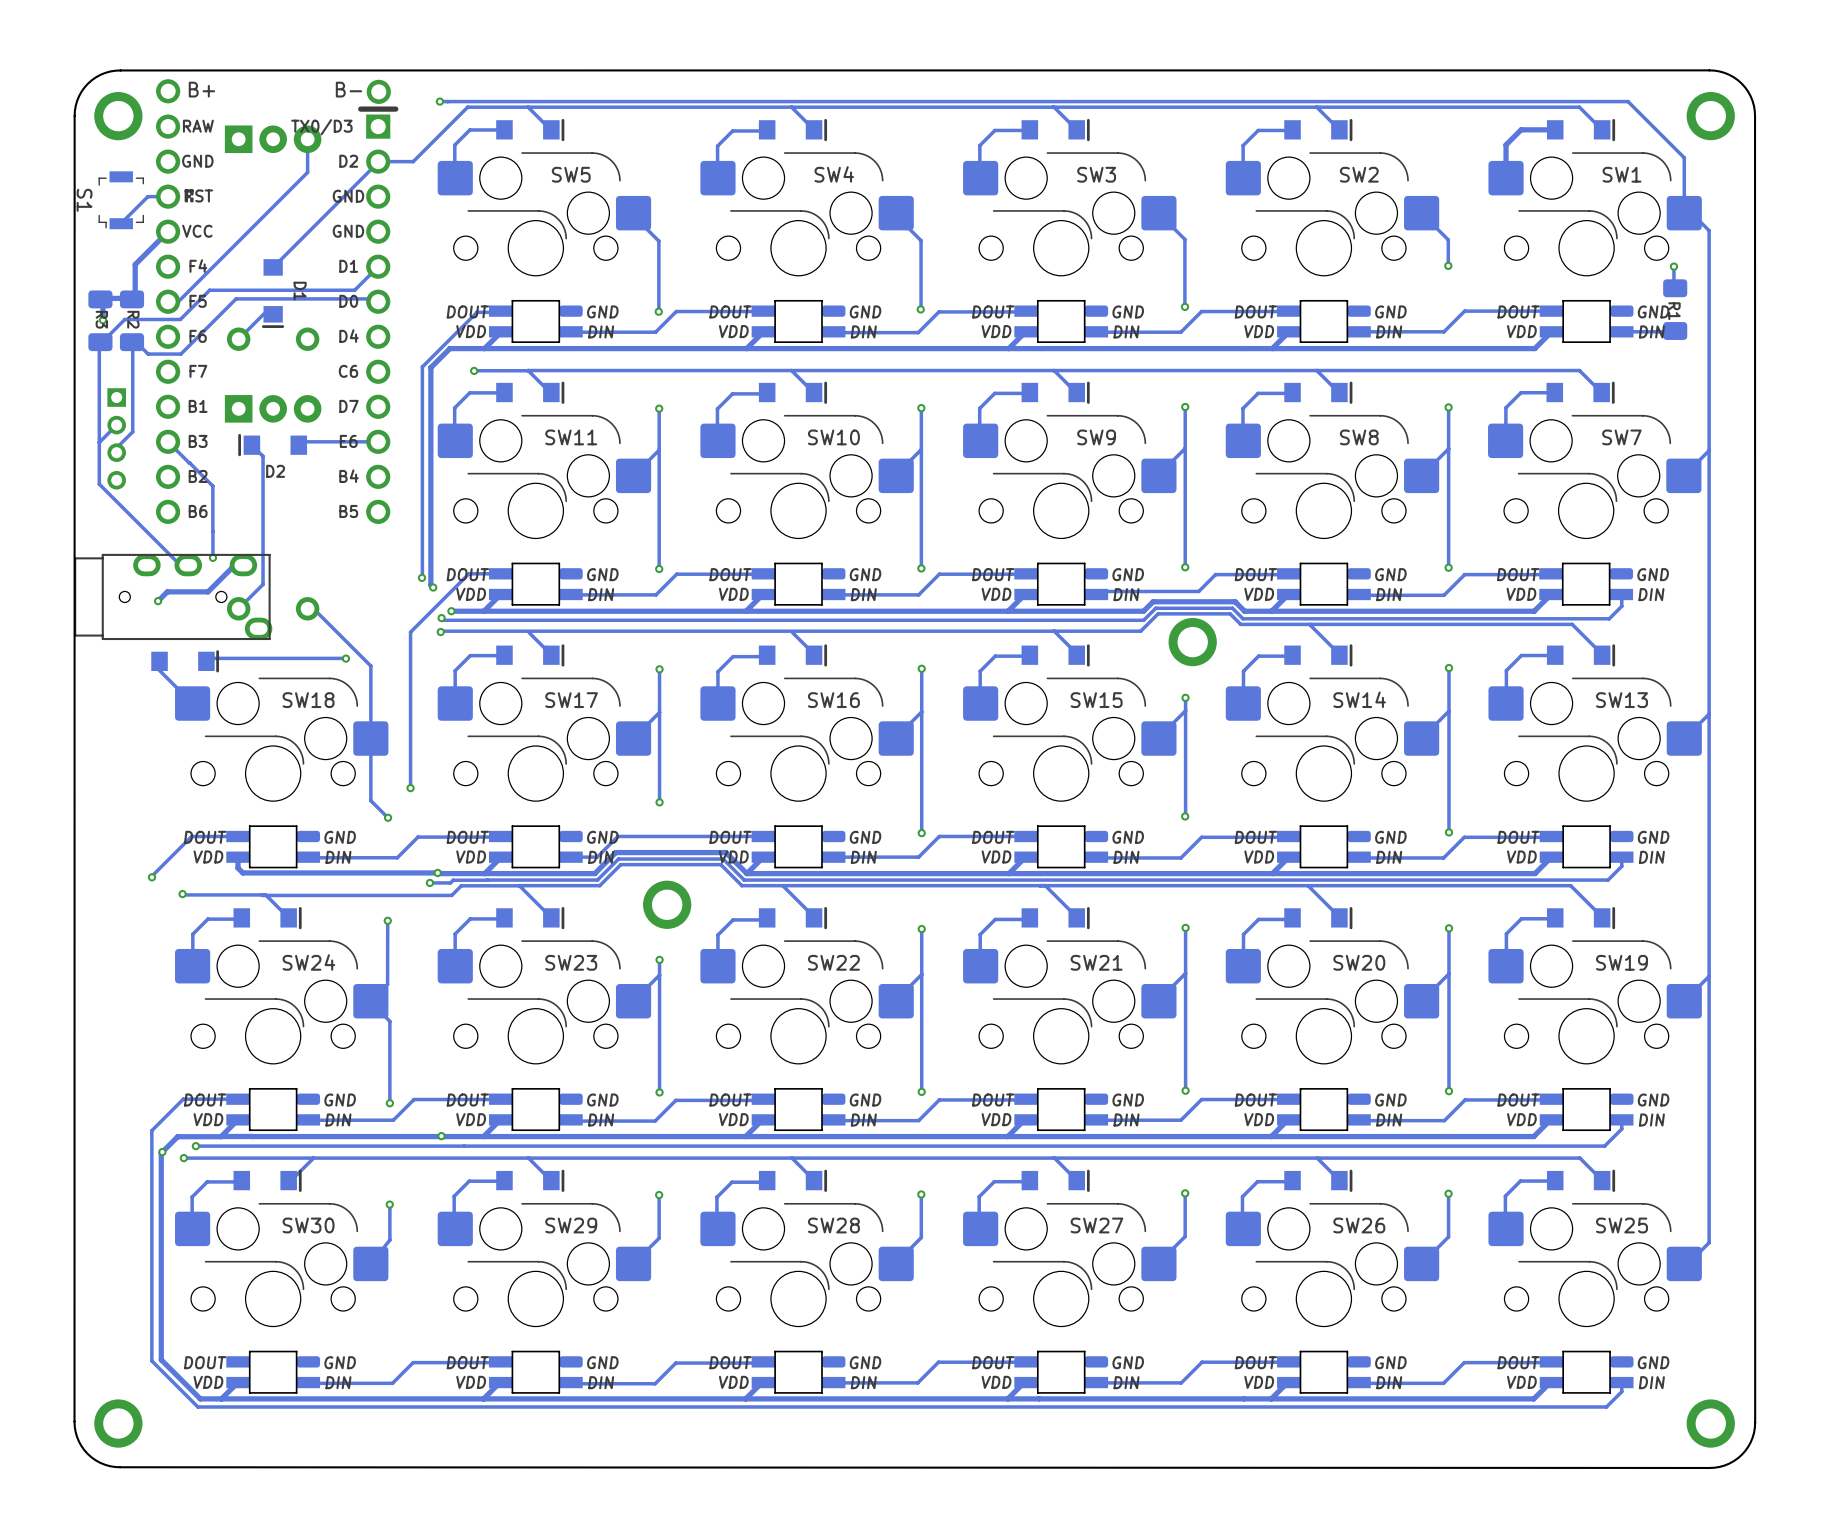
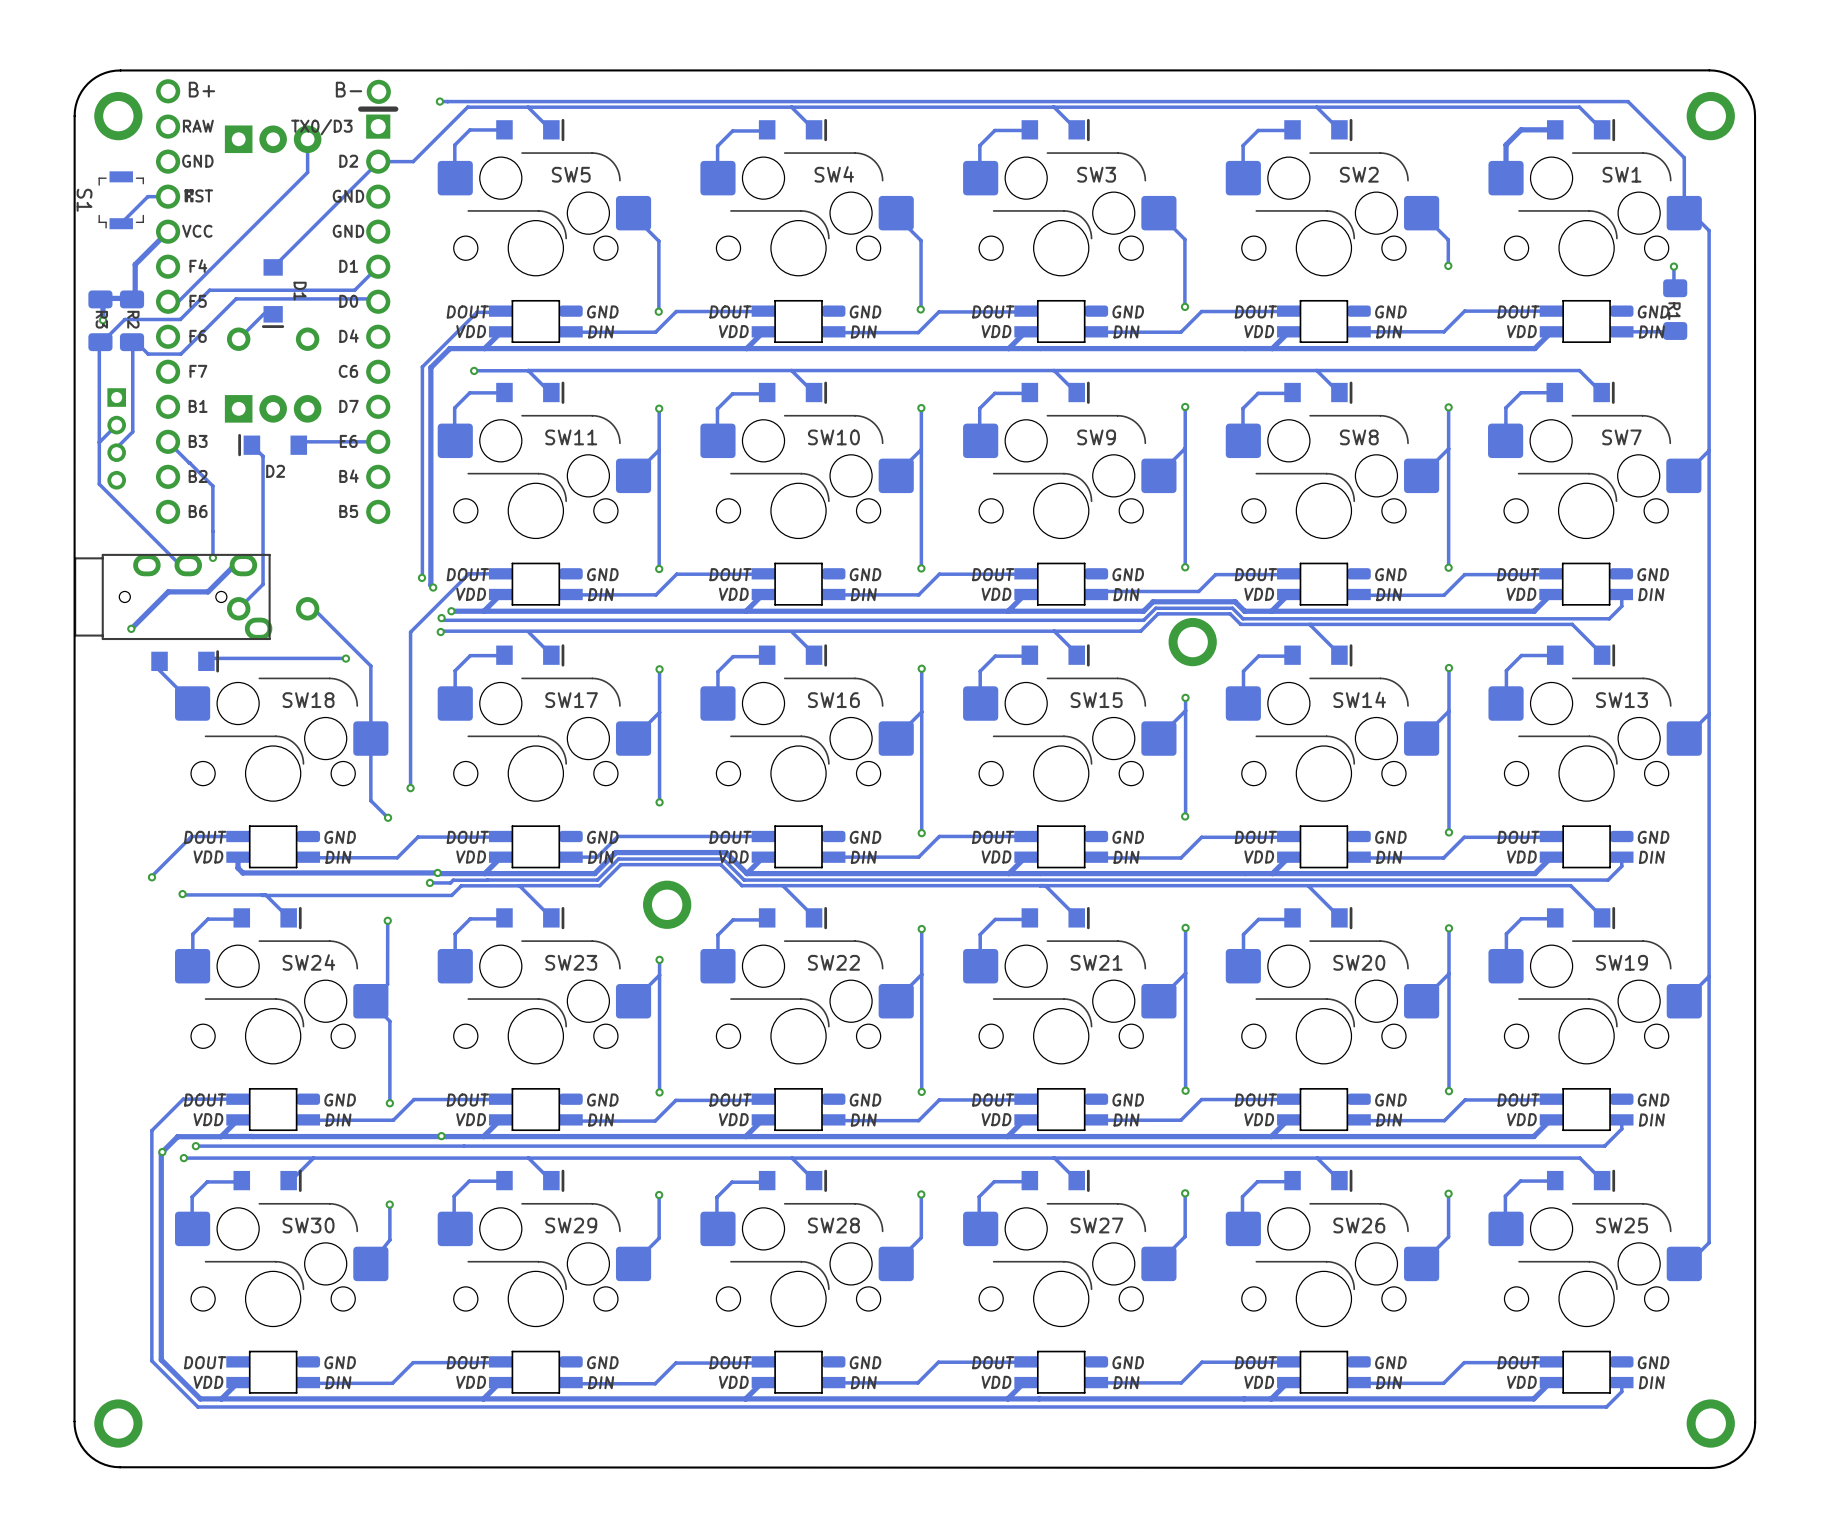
track: (168, 591) (158, 601) -> (168, 591) (131, 628)
via position: (158, 601) -> (131, 628)

